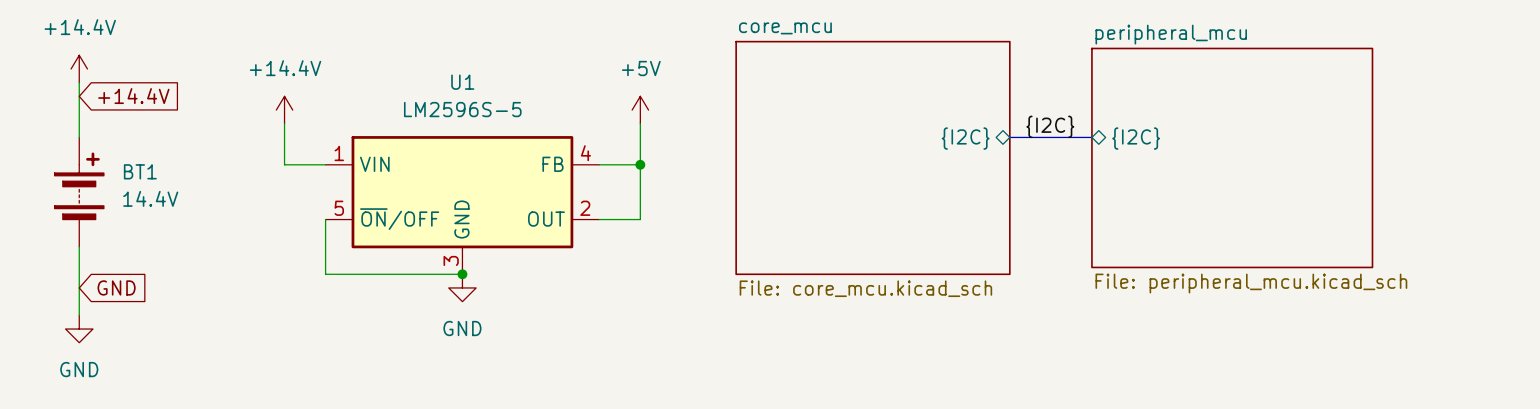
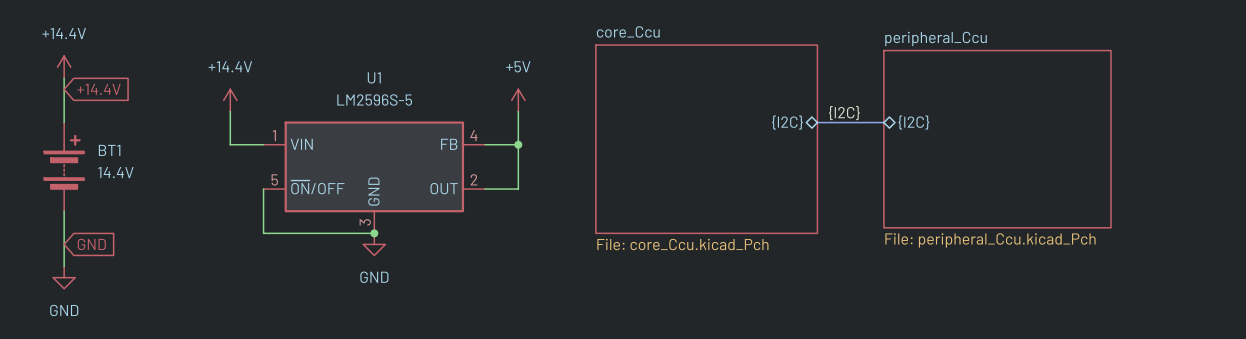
sheet core_mcu name: core_mcu (785, 28) -> core_Ccu (628, 31)
sheet peripheral_mcu name: peripheral_mcu (1171, 34) -> peripheral_Ccu (936, 38)
sheet peripheral_mcu value: File: peripheral_mcu.kicad_sch (1251, 283) -> File: peripheral_Ccu.kicad_Pch (990, 240)
sheet core_mcu value: File: core_mcu.kicad_sch (865, 288) -> File: core_Ccu.kicad_Pch (682, 244)

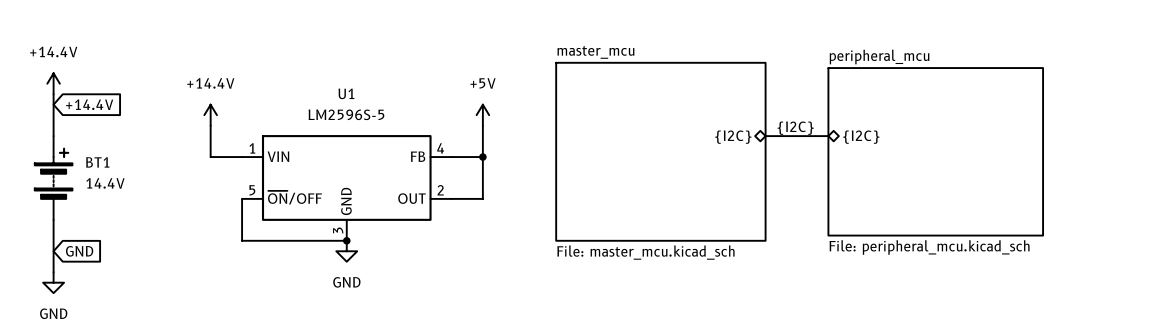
sheet core_Ccu name: core_Ccu (628, 31) -> master_mcu (595, 52)
sheet peripheral_Ccu name: peripheral_Ccu (936, 38) -> peripheral_mcu (879, 57)
sheet peripheral_Ccu value: File: peripheral_Ccu.kicad_Pch (990, 240) -> File: peripheral_mcu.kicad_sch (929, 247)
sheet core_Ccu value: File: core_Ccu.kicad_Pch (682, 244) -> File: master_mcu.kicad_sch (645, 252)

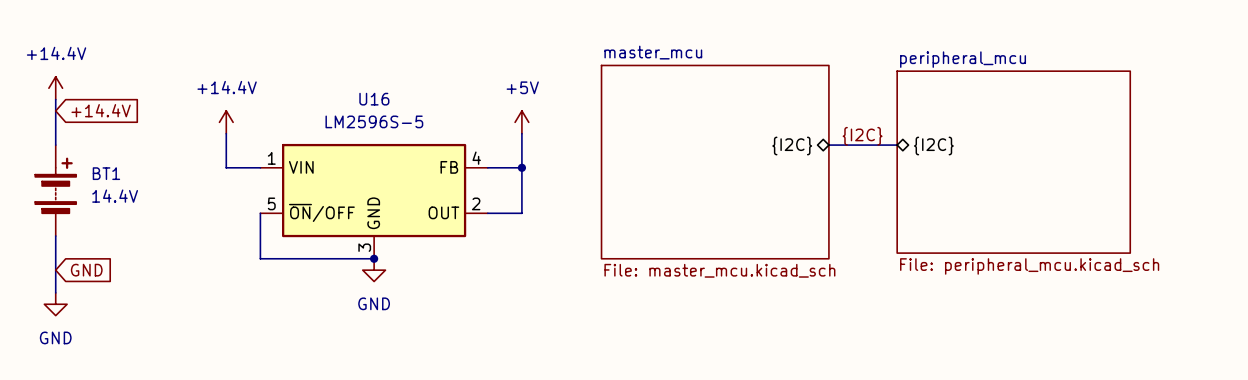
U1 name: U1 (346, 93) -> U16 (374, 99)

